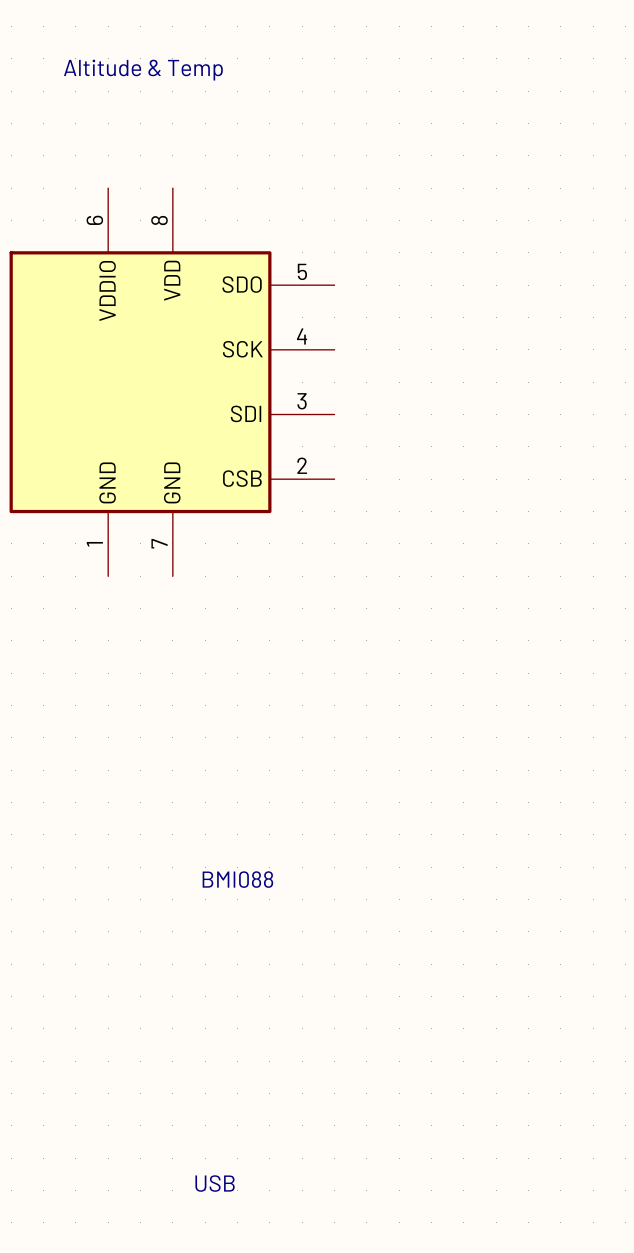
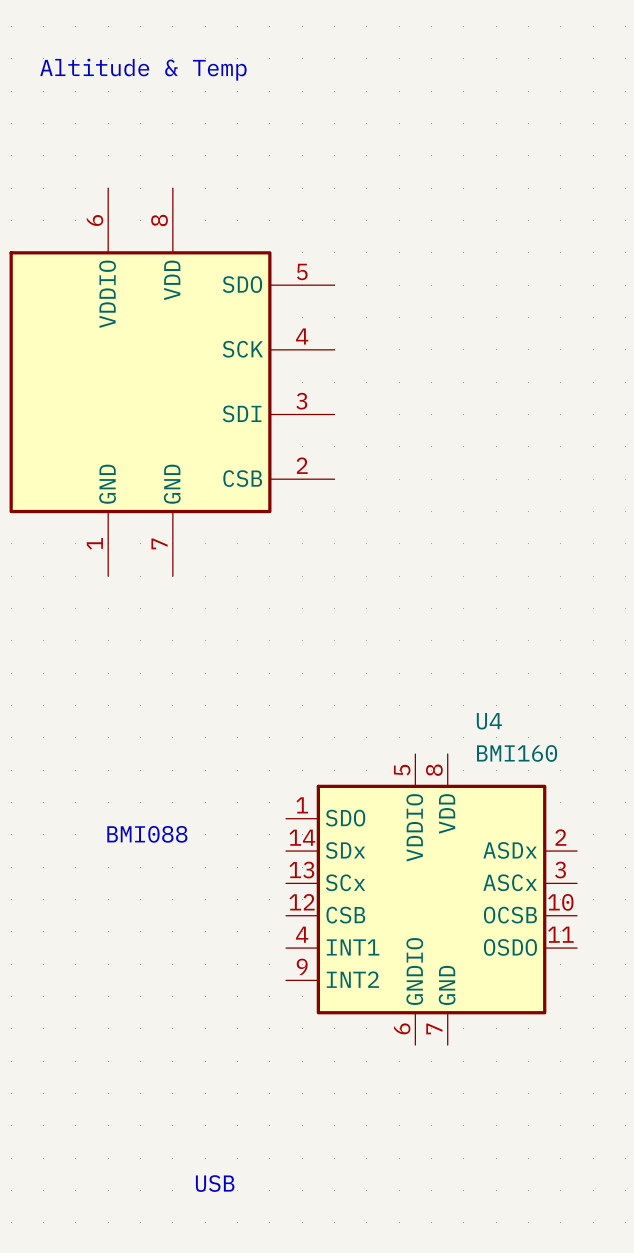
text position: BMI088 (237, 879) -> BMI088 (147, 834)
U4: none -> BMI160 (431, 899)

